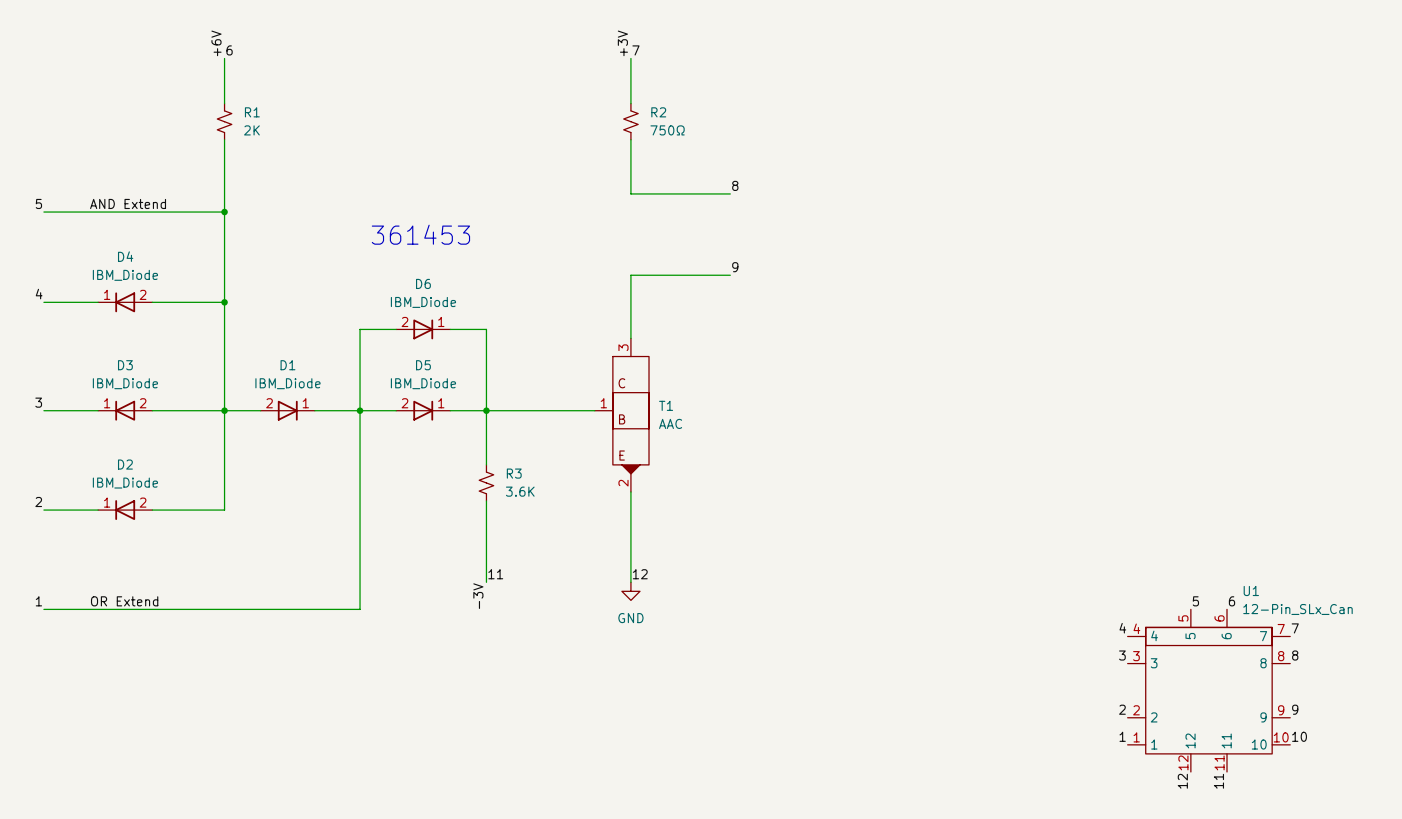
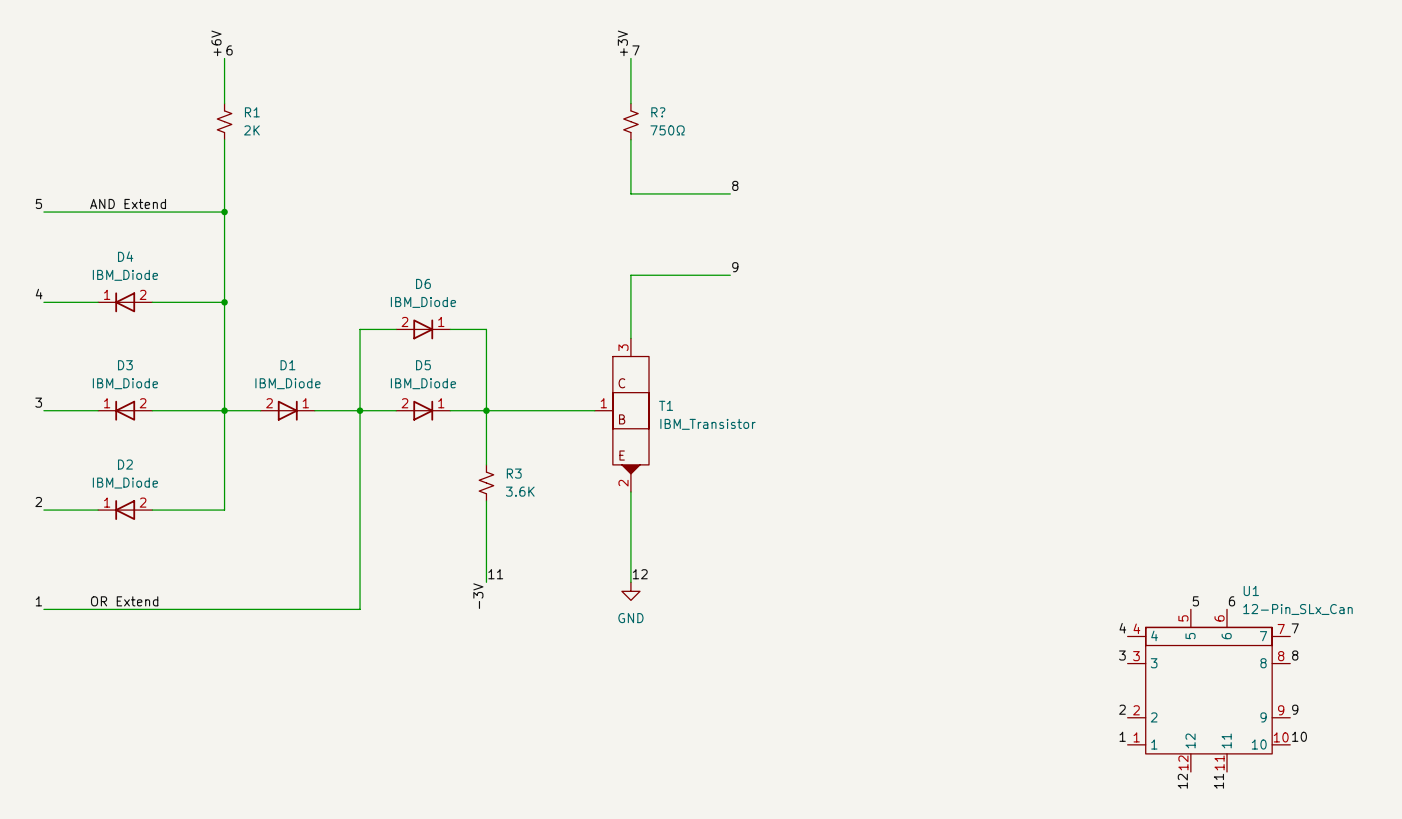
R2 name: R2 (658, 112) -> R? (658, 112)
text: 361453 (420, 234) -> none
T1 value: AAC (670, 423) -> IBM_Transistor (707, 424)

